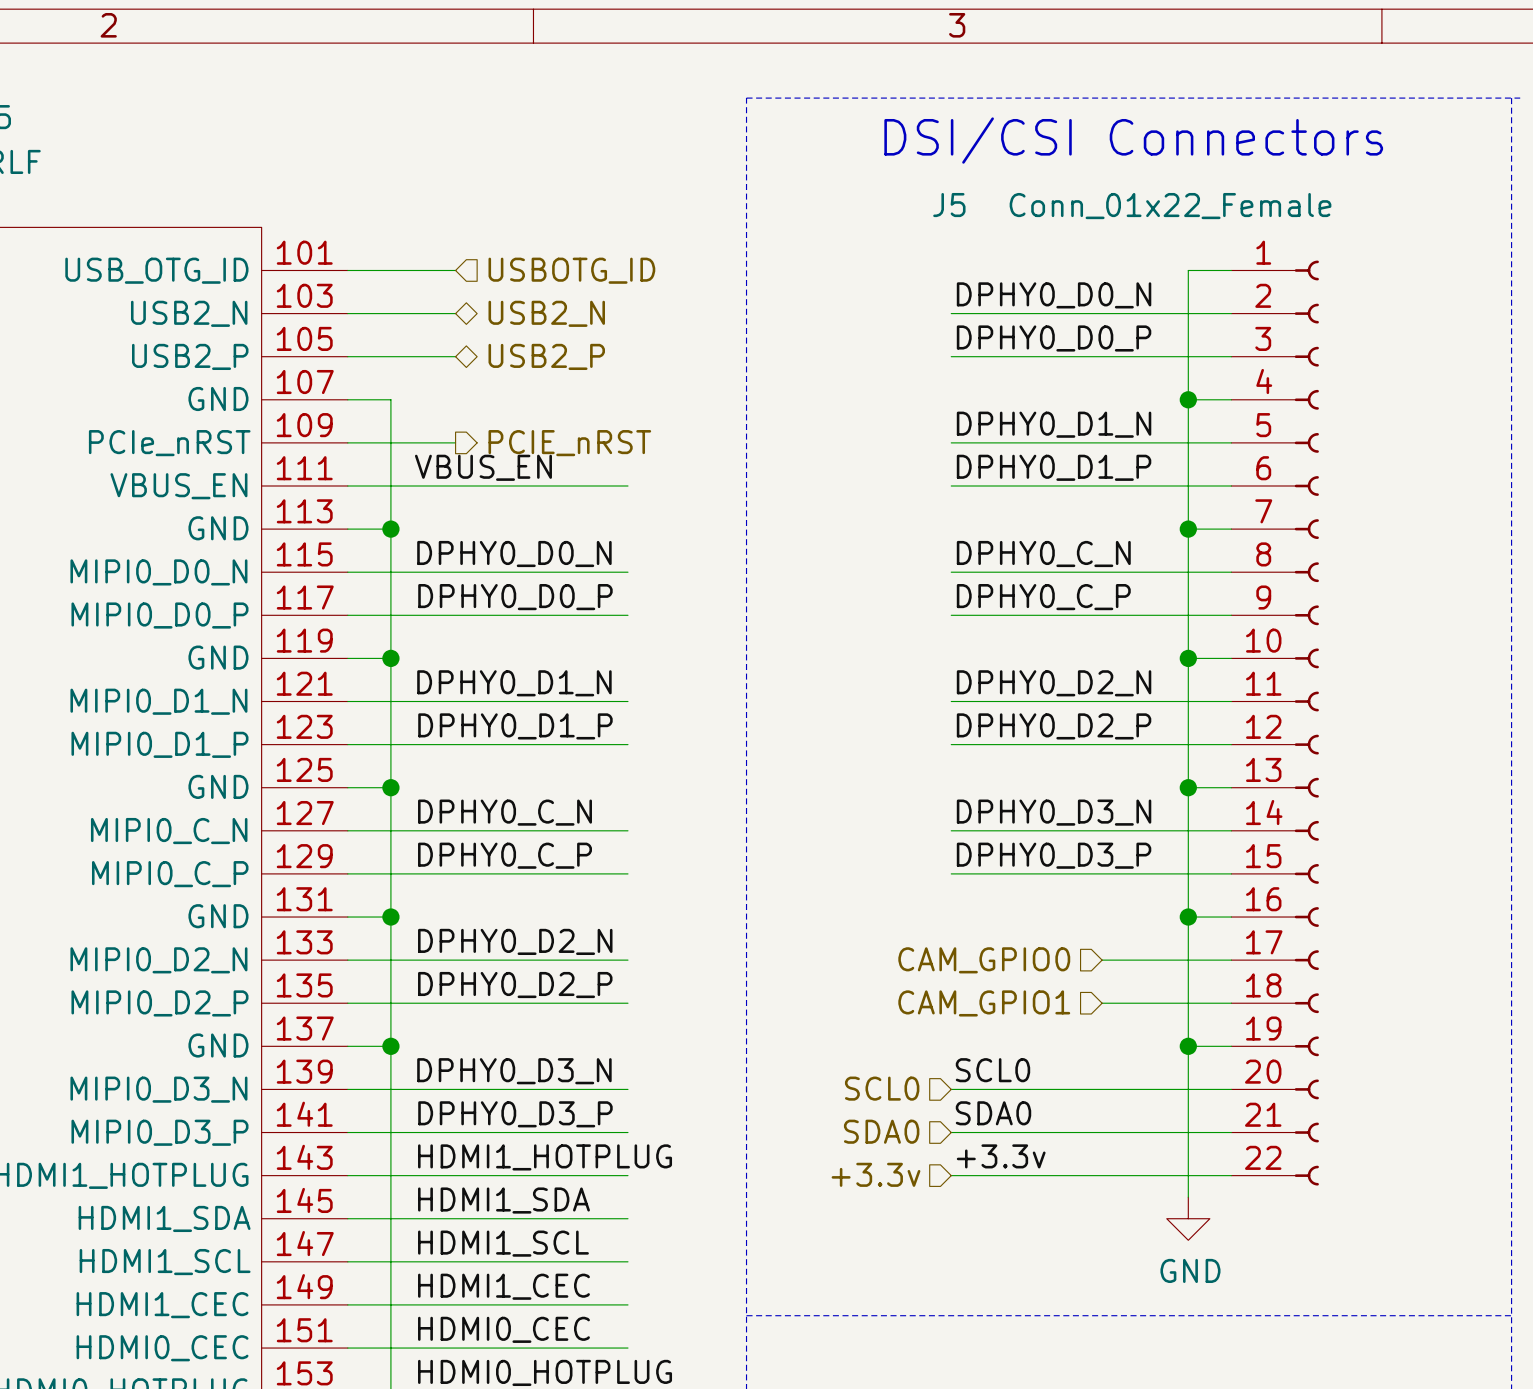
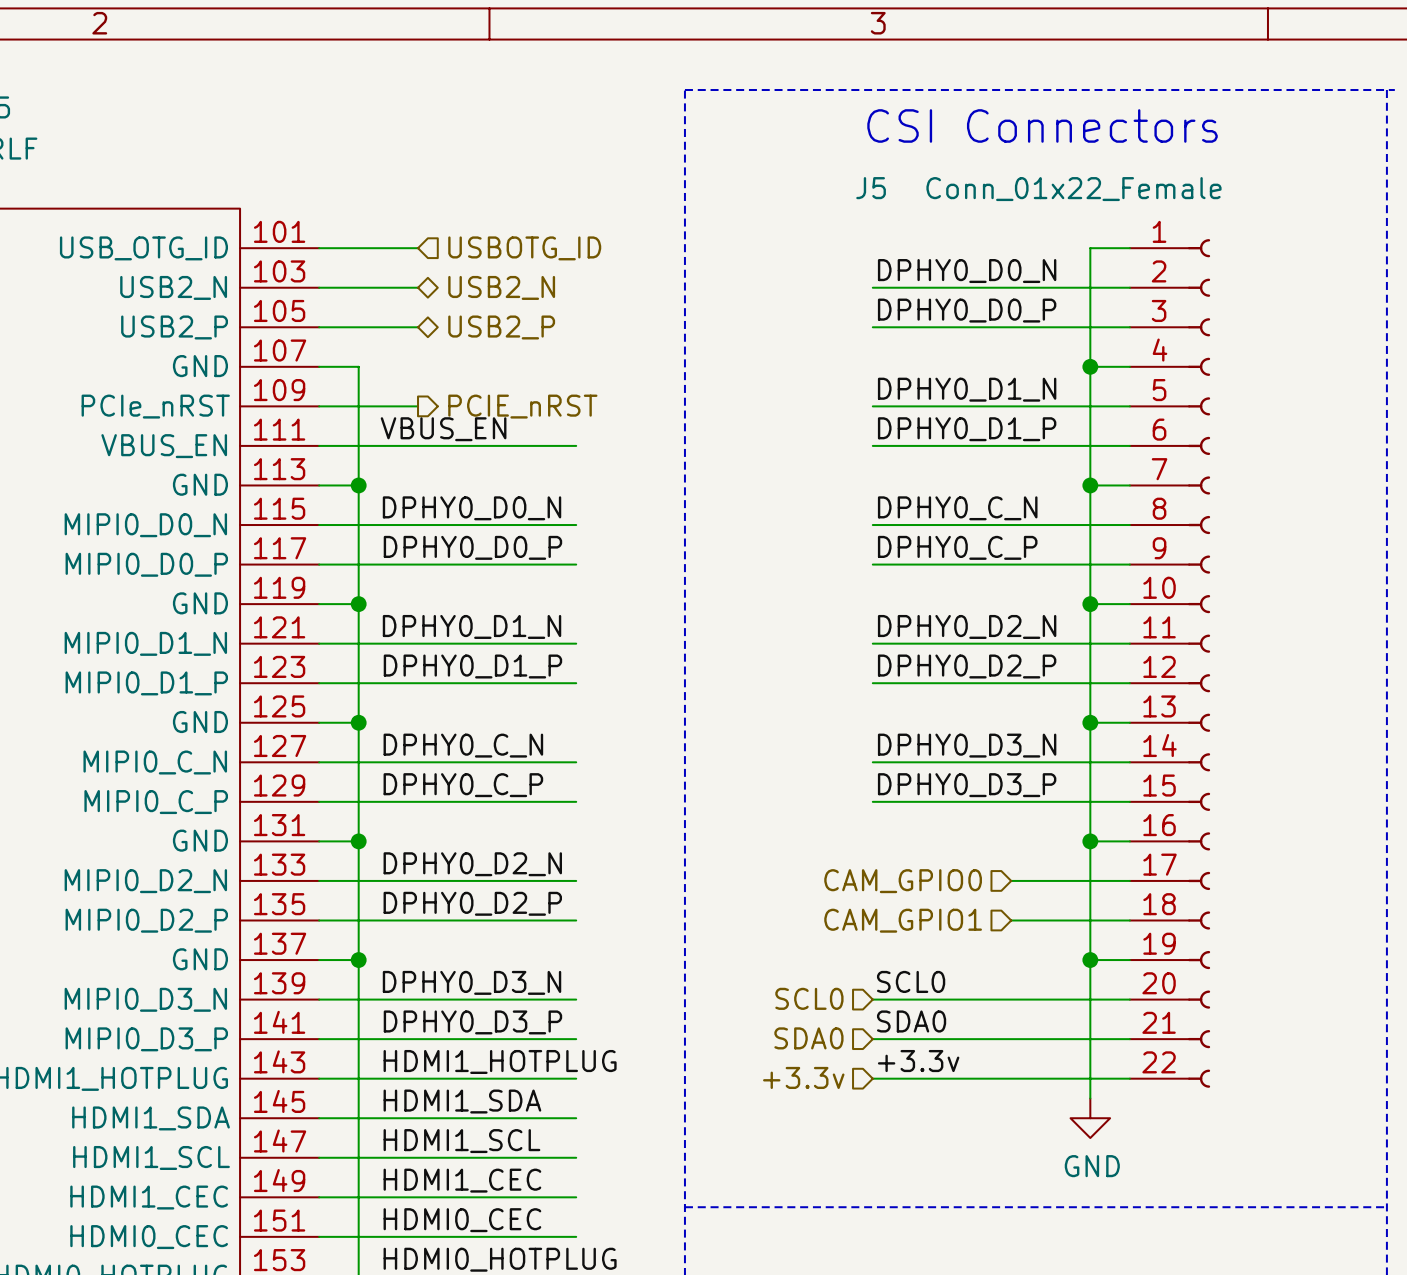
text: DSI/CSI Connectors (1133, 140) -> CSI Connectors (1042, 125)

